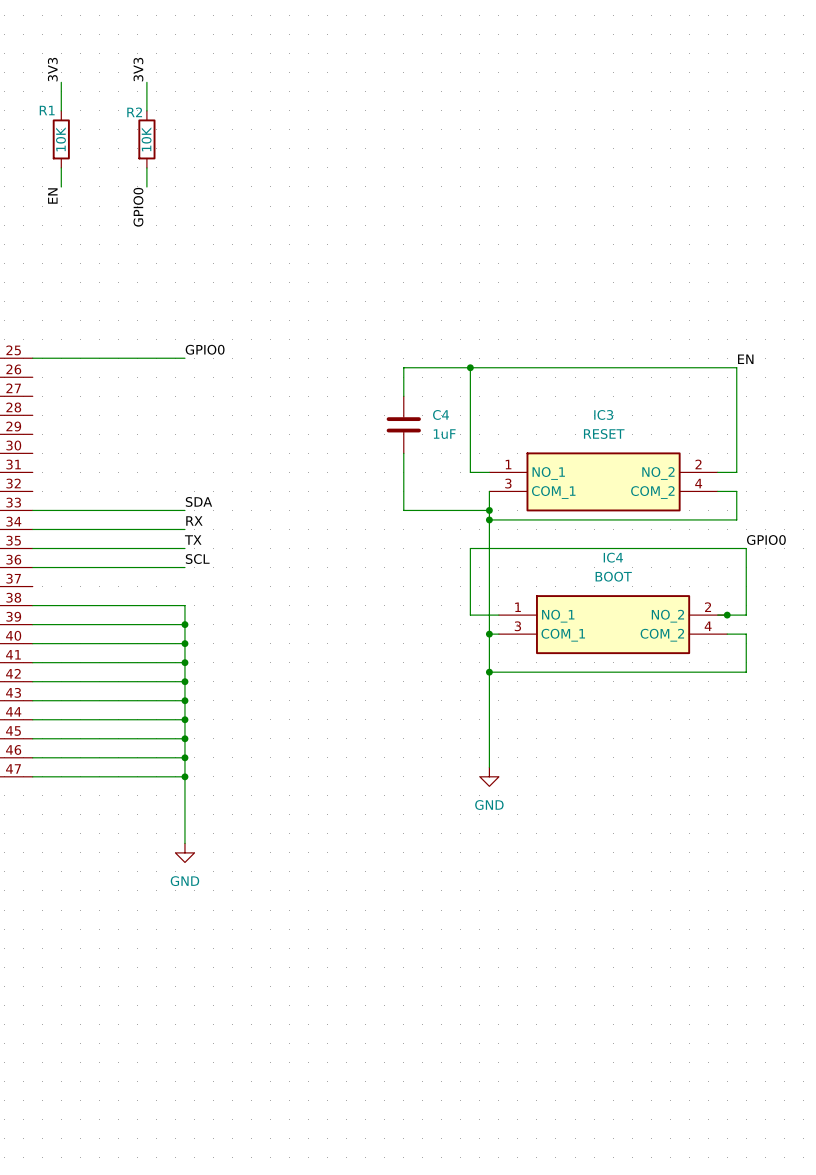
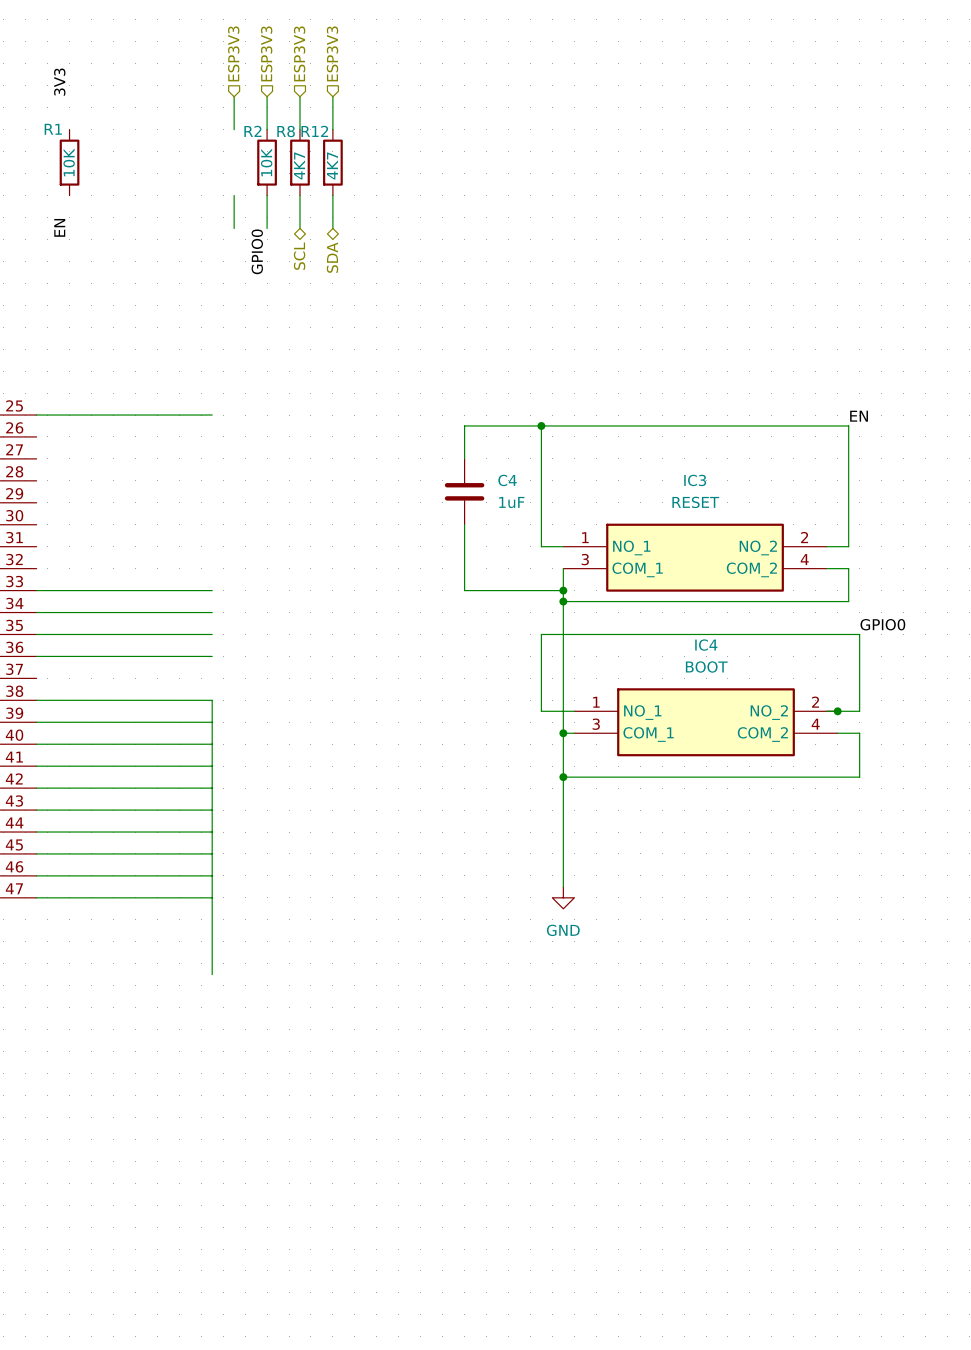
hierarchical label: none -> ESP3V3 (233, 53)
hierarchical label: none -> ESP3V3 (266, 53)
hierarchical label: none -> ESP3V3 (299, 53)
hierarchical label: none -> ESP3V3 (332, 53)
label: 3V3 (138, 69) -> none
wire: (61, 82) (61, 110) -> (234, 96) (234, 129)
wire: (146, 82) (146, 110) -> (332, 96) (332, 129)
wire: none -> (267, 96) (267, 129)
wire: none -> (299, 96) (299, 129)
R2 position: (146, 139) -> (267, 162)
R8: none -> 4K7 (299, 162)
R12: none -> 4K7 (332, 162)
wire: (61, 167) (61, 186) -> none
wire: (146, 167) (146, 186) -> none
wire: none -> (234, 195) (234, 228)
wire: none -> (267, 195) (267, 228)
wire: none -> (299, 195) (299, 228)
wire: none -> (332, 195) (332, 228)
label: GPIO0 (138, 207) -> none
label: none -> GPIO0 (257, 251)
hierarchical label: none -> SCL (299, 256)
hierarchical label: none -> SDA (332, 257)
label: GPIO0 (205, 349) -> none
label: SDA (198, 501) -> none
label: RX (194, 520) -> none
label: TX (193, 540) -> none
label: SCL (197, 559) -> none
junction: (184, 624) -> none
junction: (184, 643) -> none
junction: (184, 662) -> none
junction: (184, 681) -> none
junction: (184, 700) -> none
junction: (184, 719) -> none
junction: (184, 738) -> none
junction: (184, 757) -> none
junction: (184, 776) -> none
power symbol: GND (184, 852) -> none

